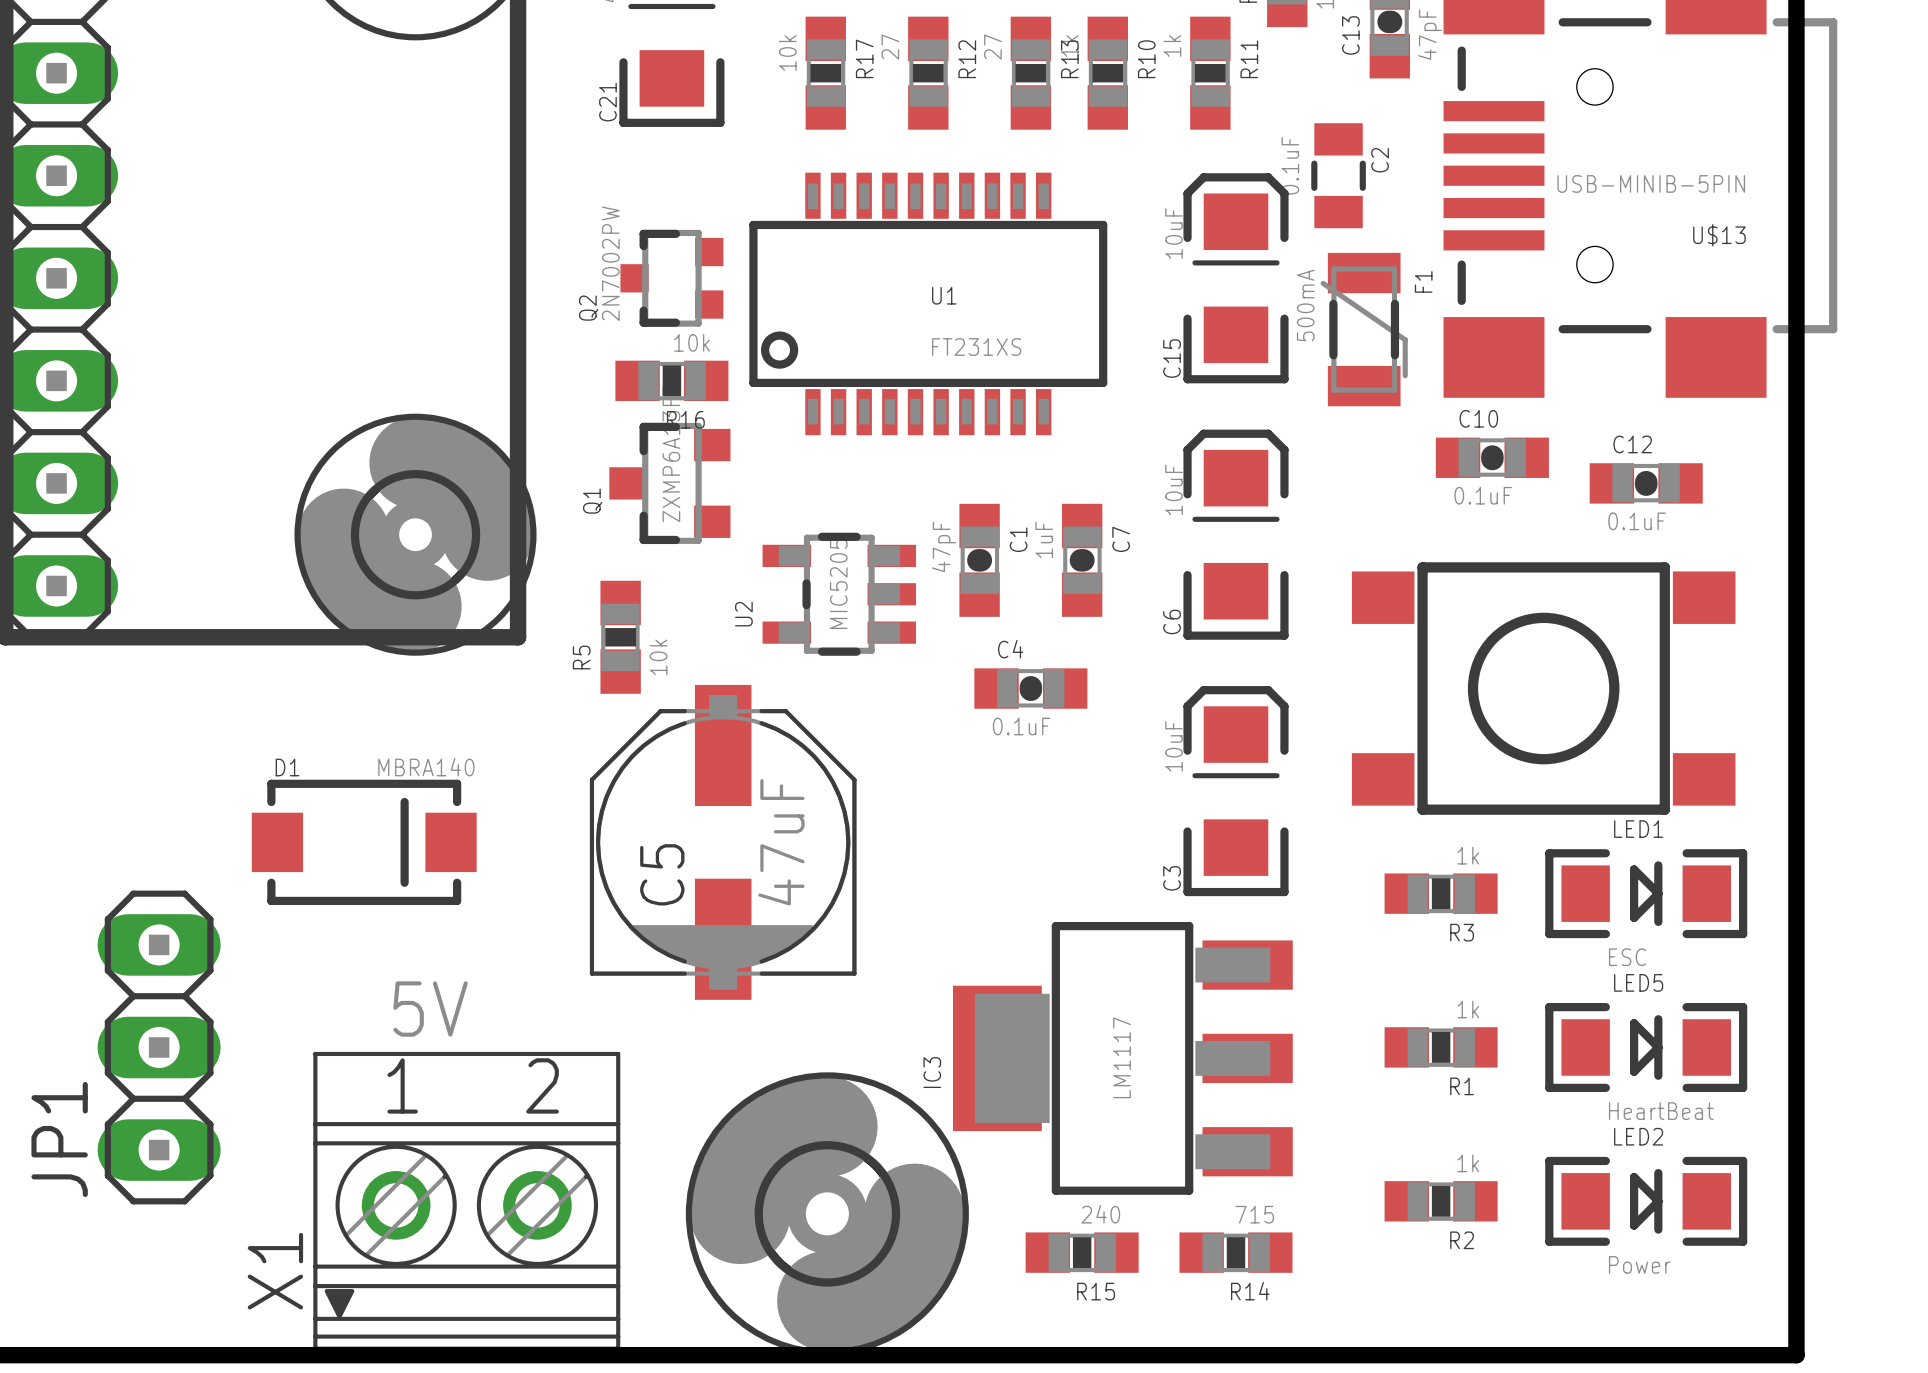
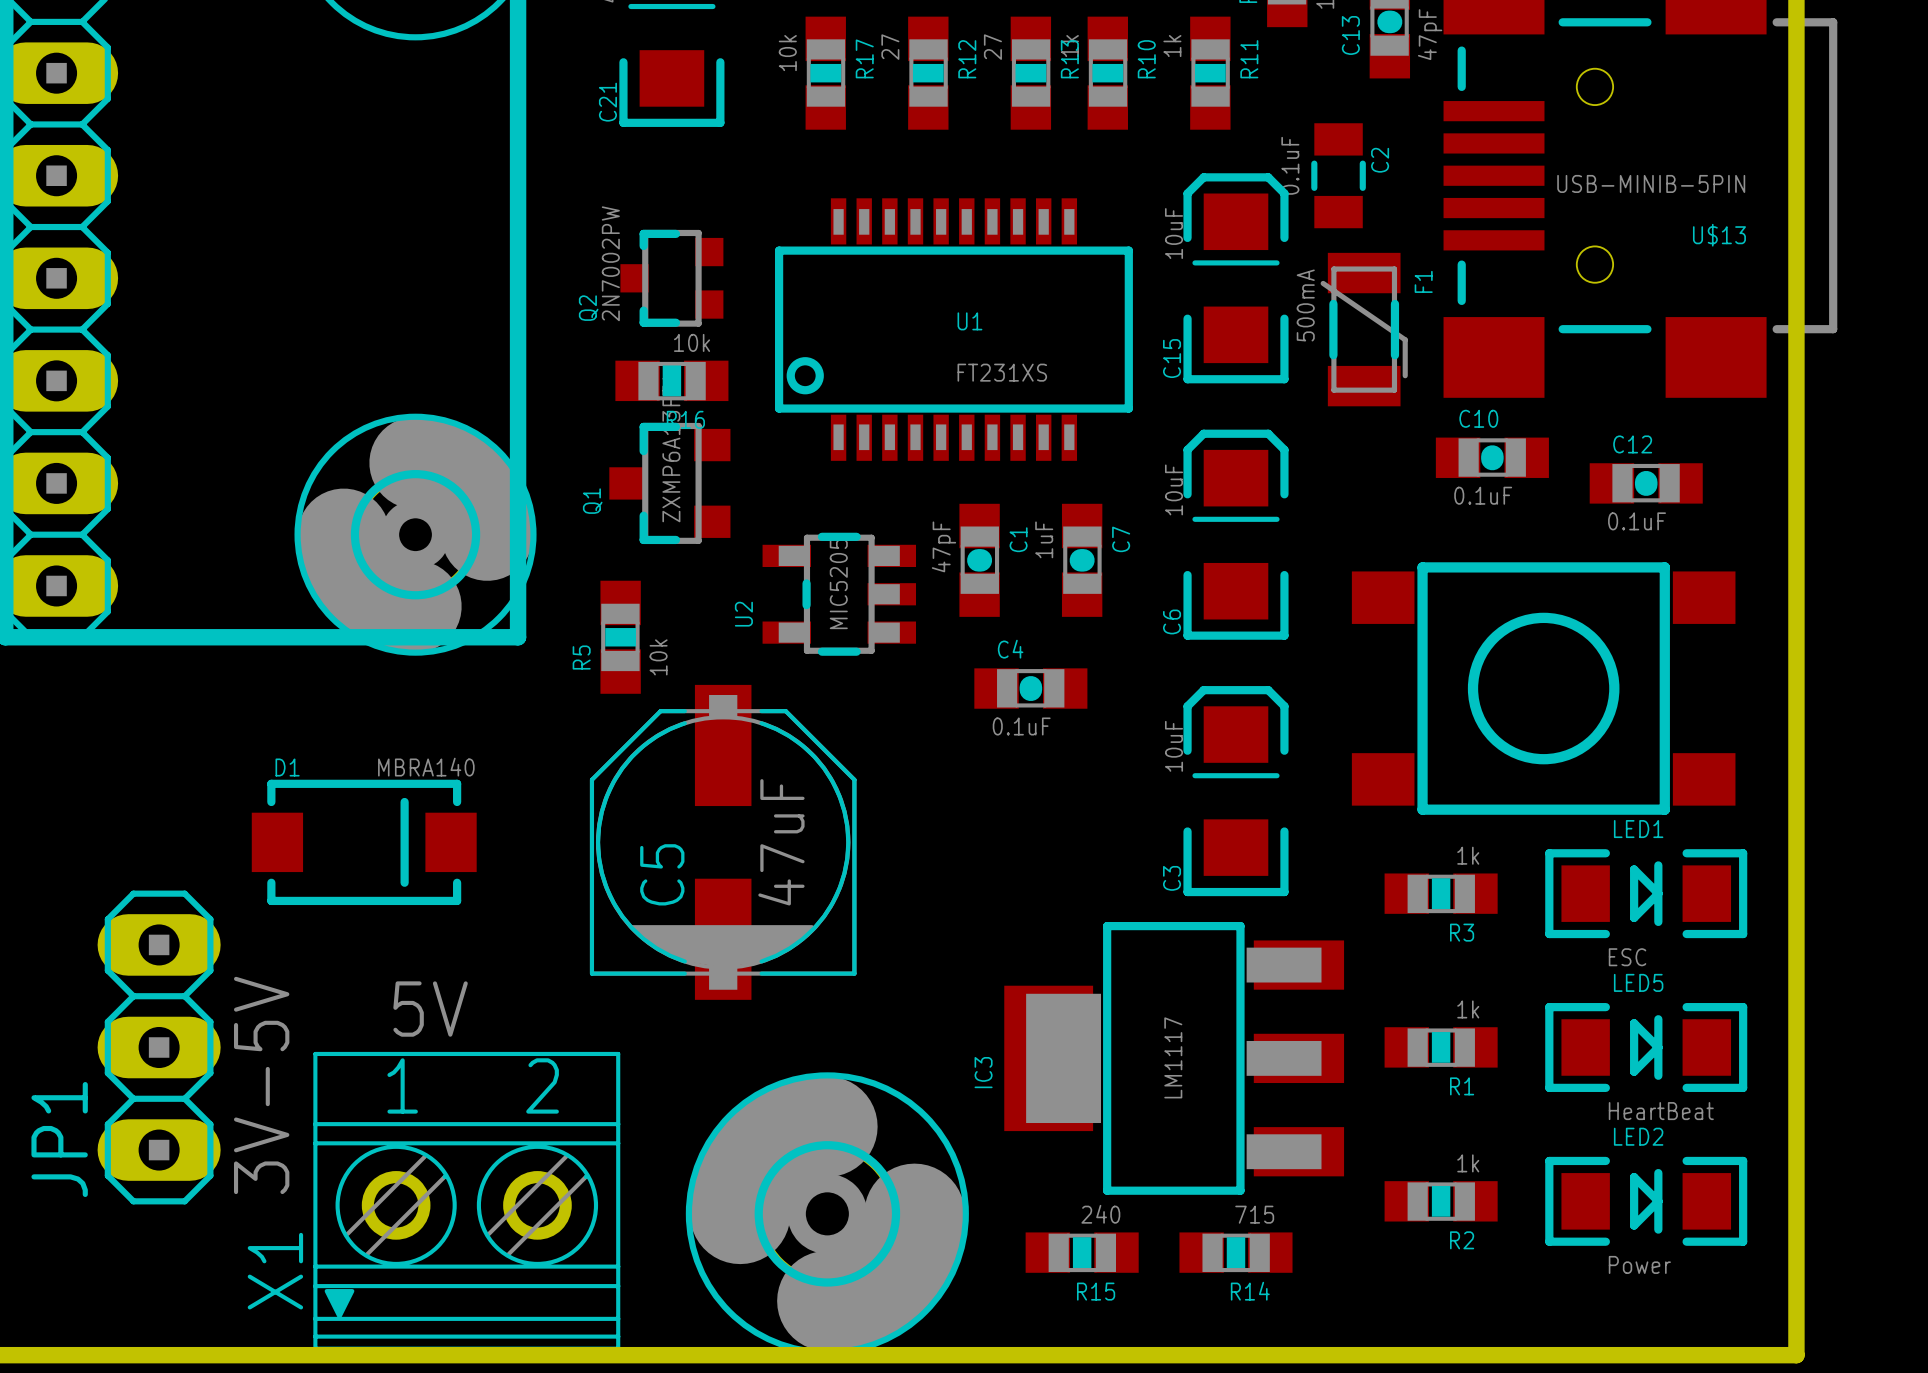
U1 position: (928, 303) -> (953, 329)
IC3 position: (1122, 1058) -> (1174, 1058)
JP1 value: none -> 3V-5V (261, 1085)

